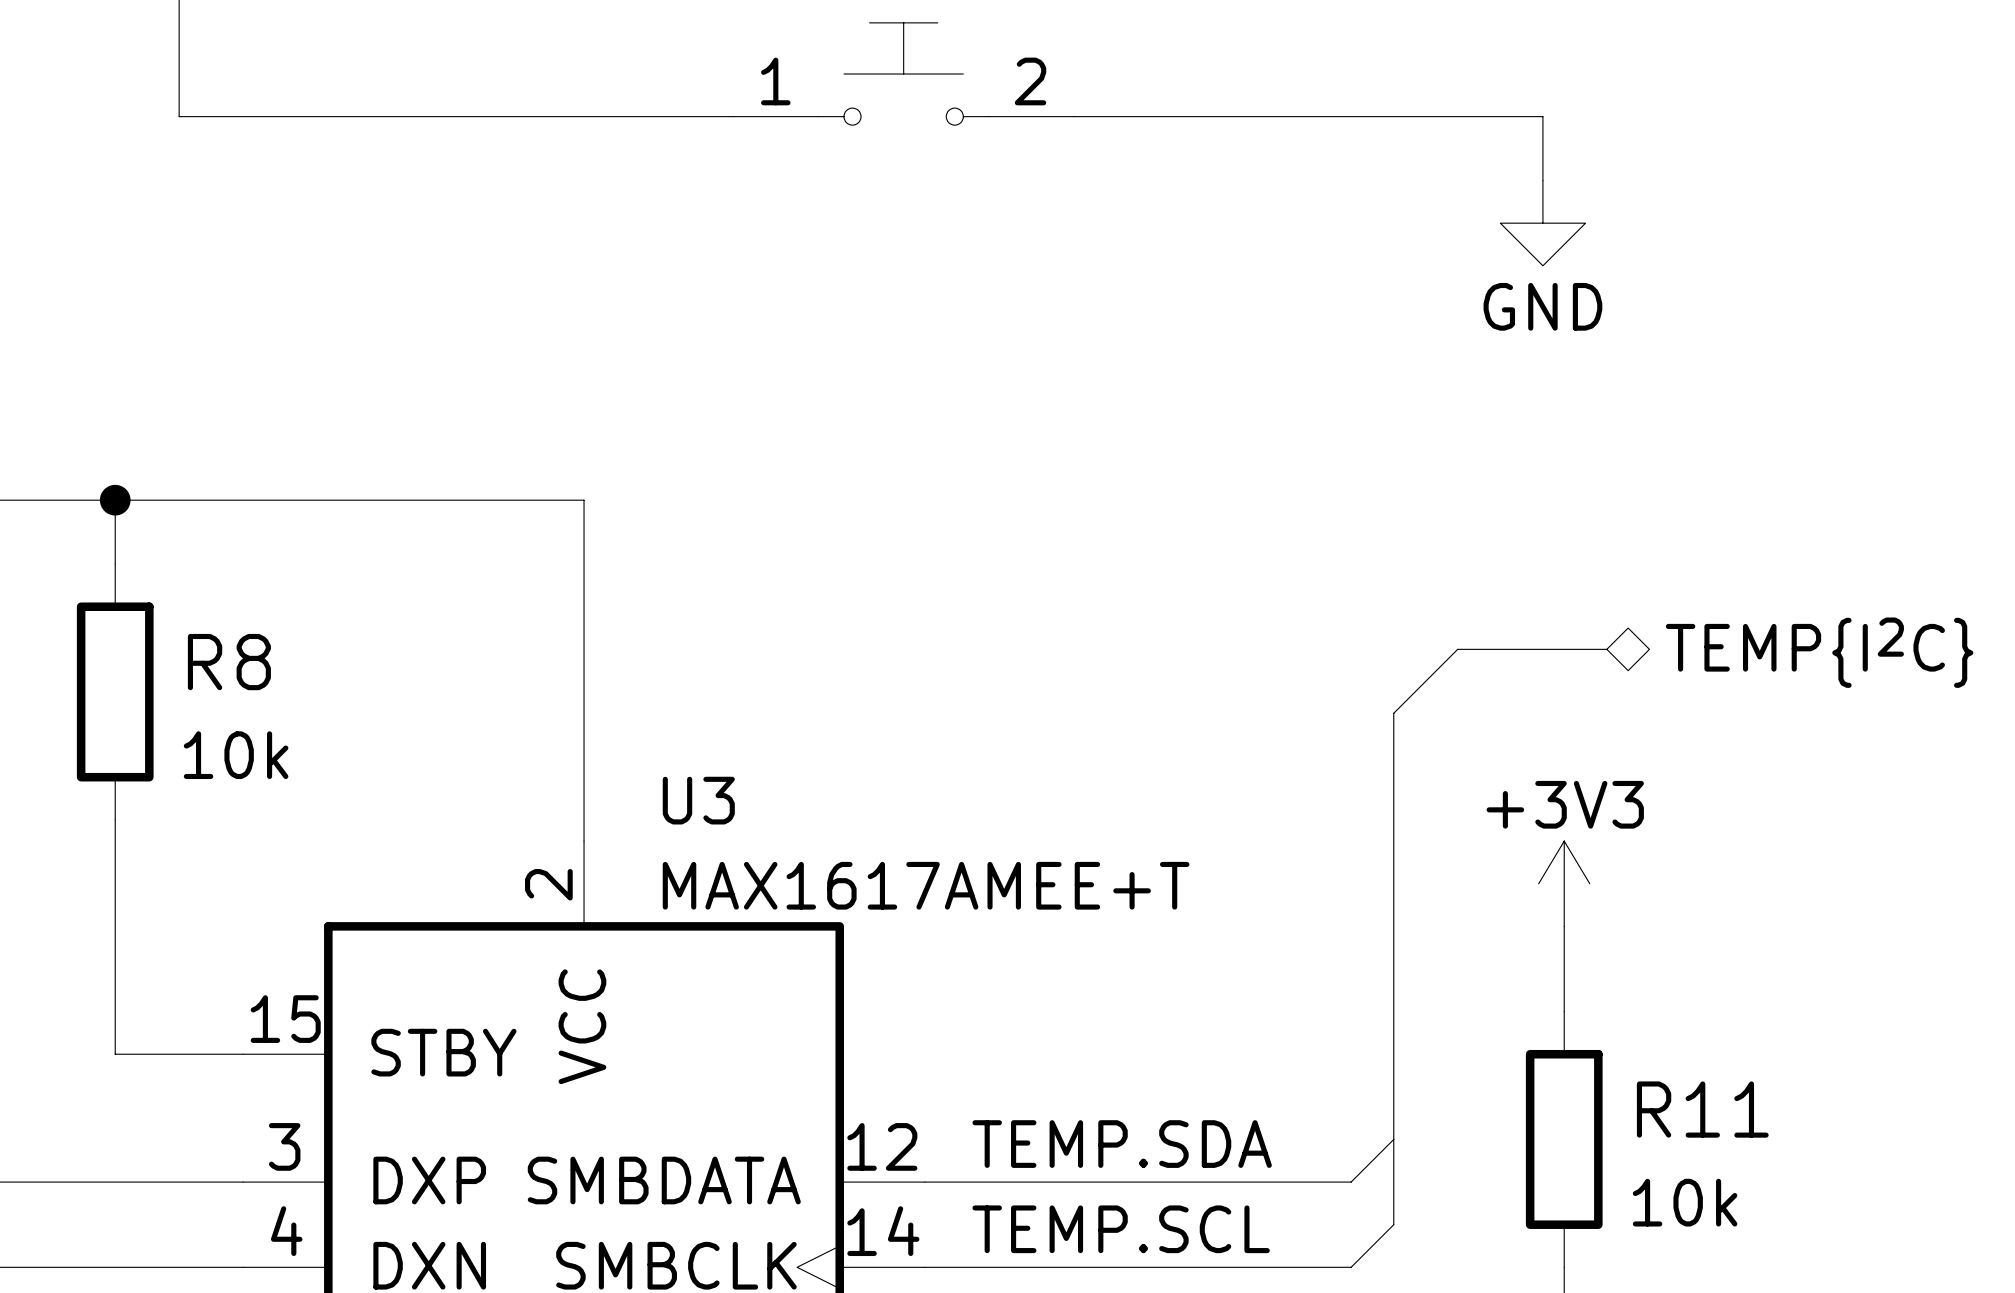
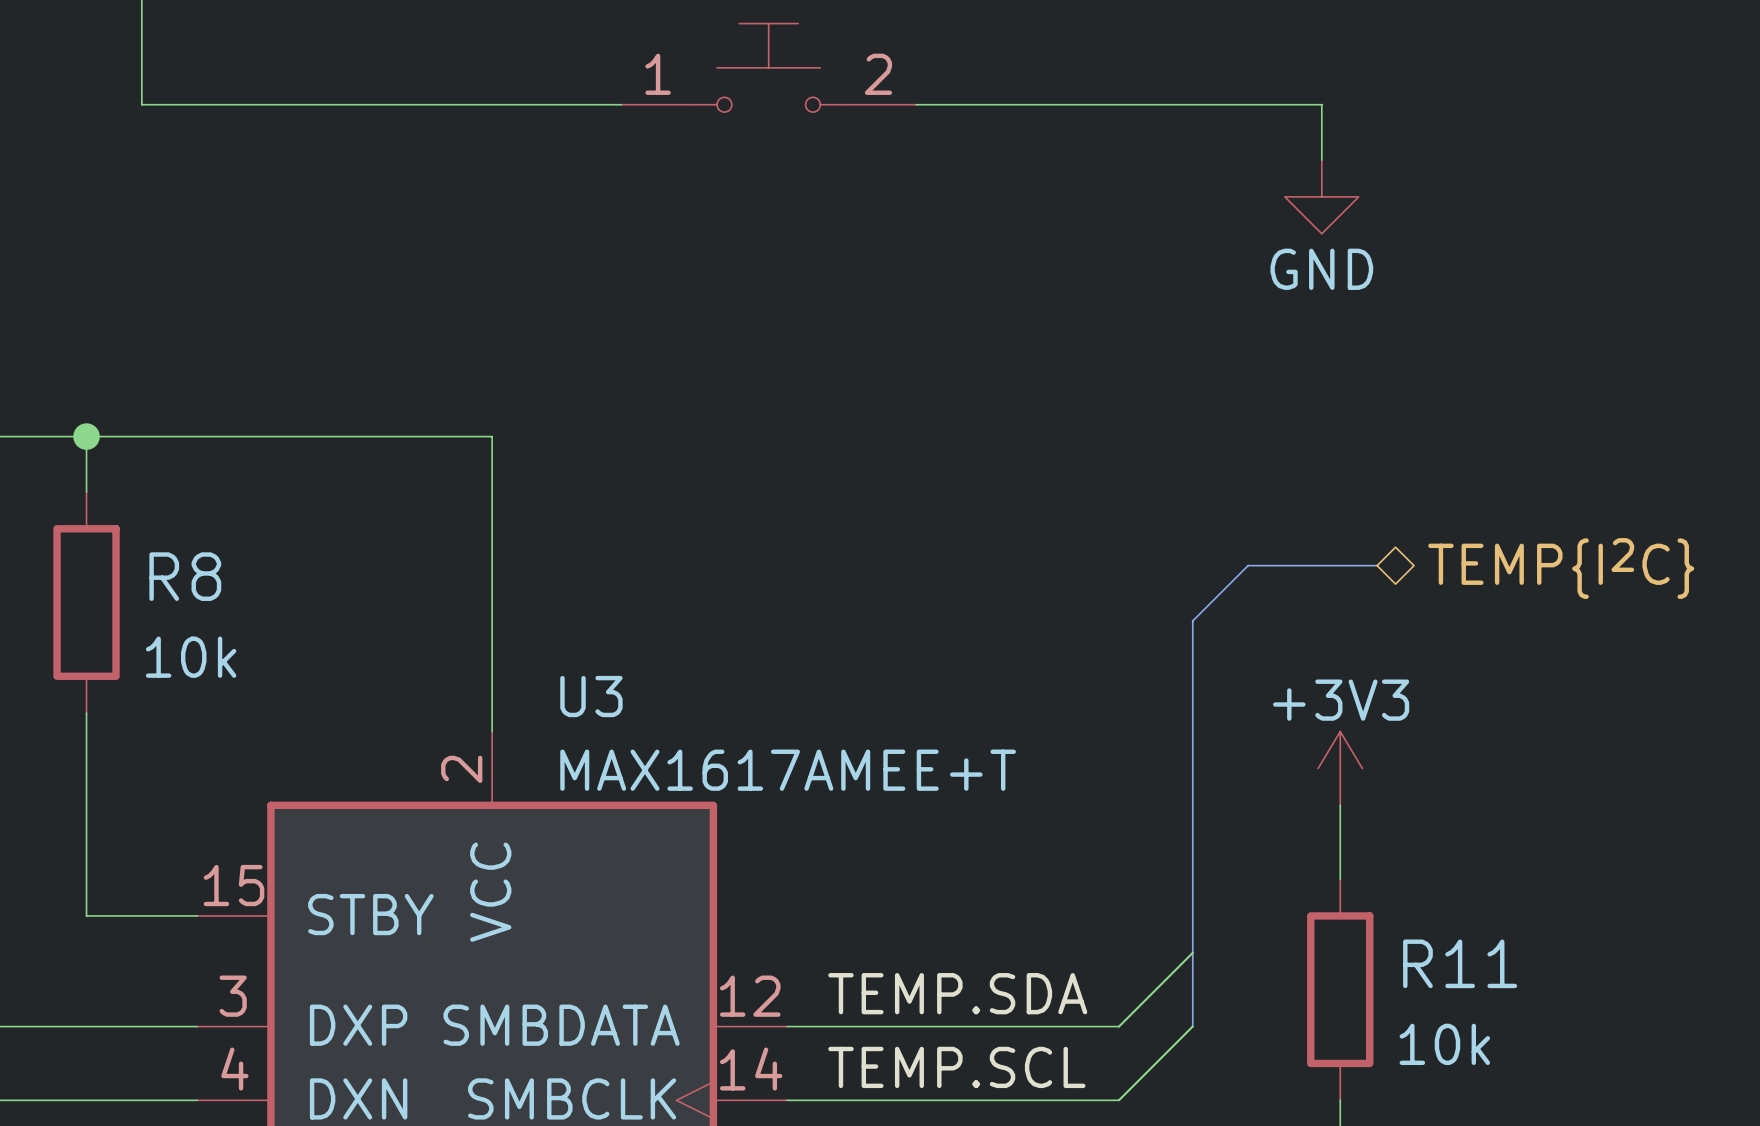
wire: (1393, 1139) (1351, 1182) (1308, 1182) -> (1192, 952) (1119, 1026)
bus: (1393, 1182) (1393, 1224) -> none
wire: (1393, 1224) (1351, 1267) (1308, 1267) -> (1192, 1026) (1119, 1100)

